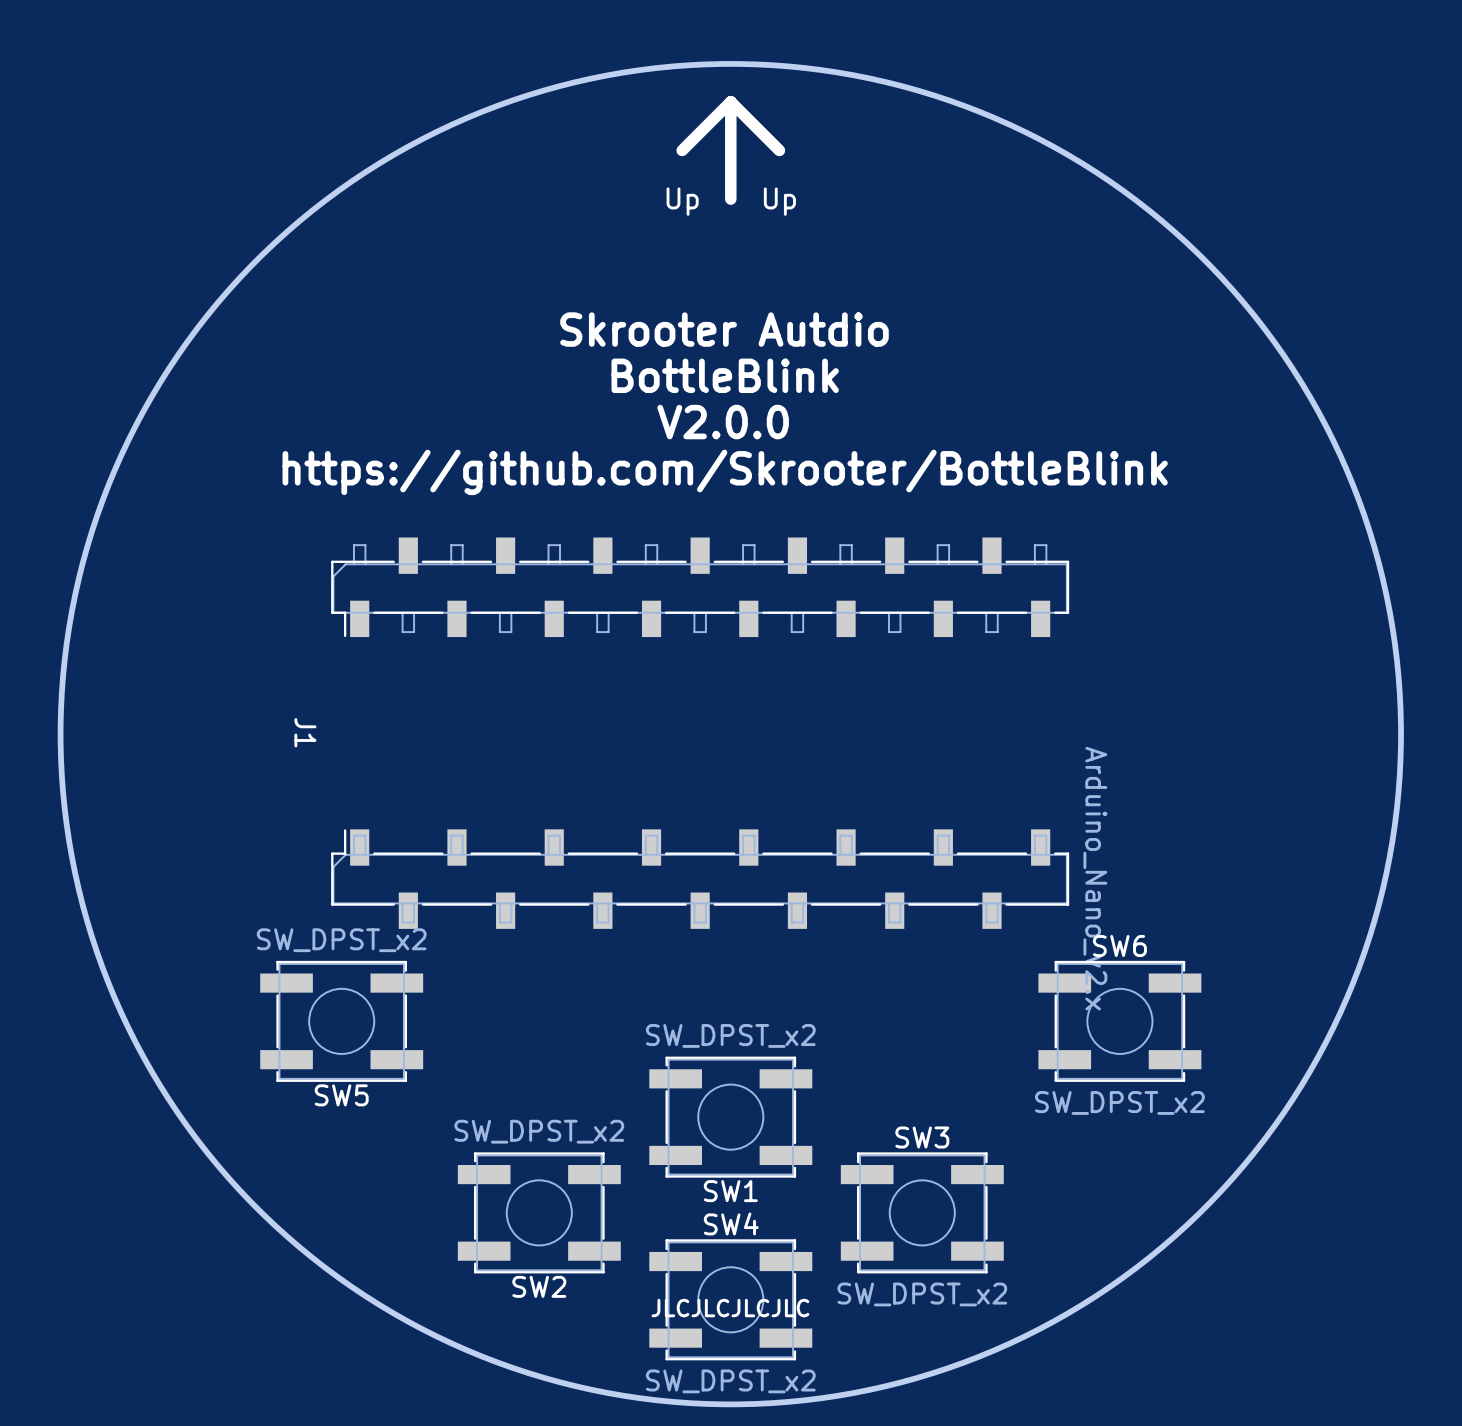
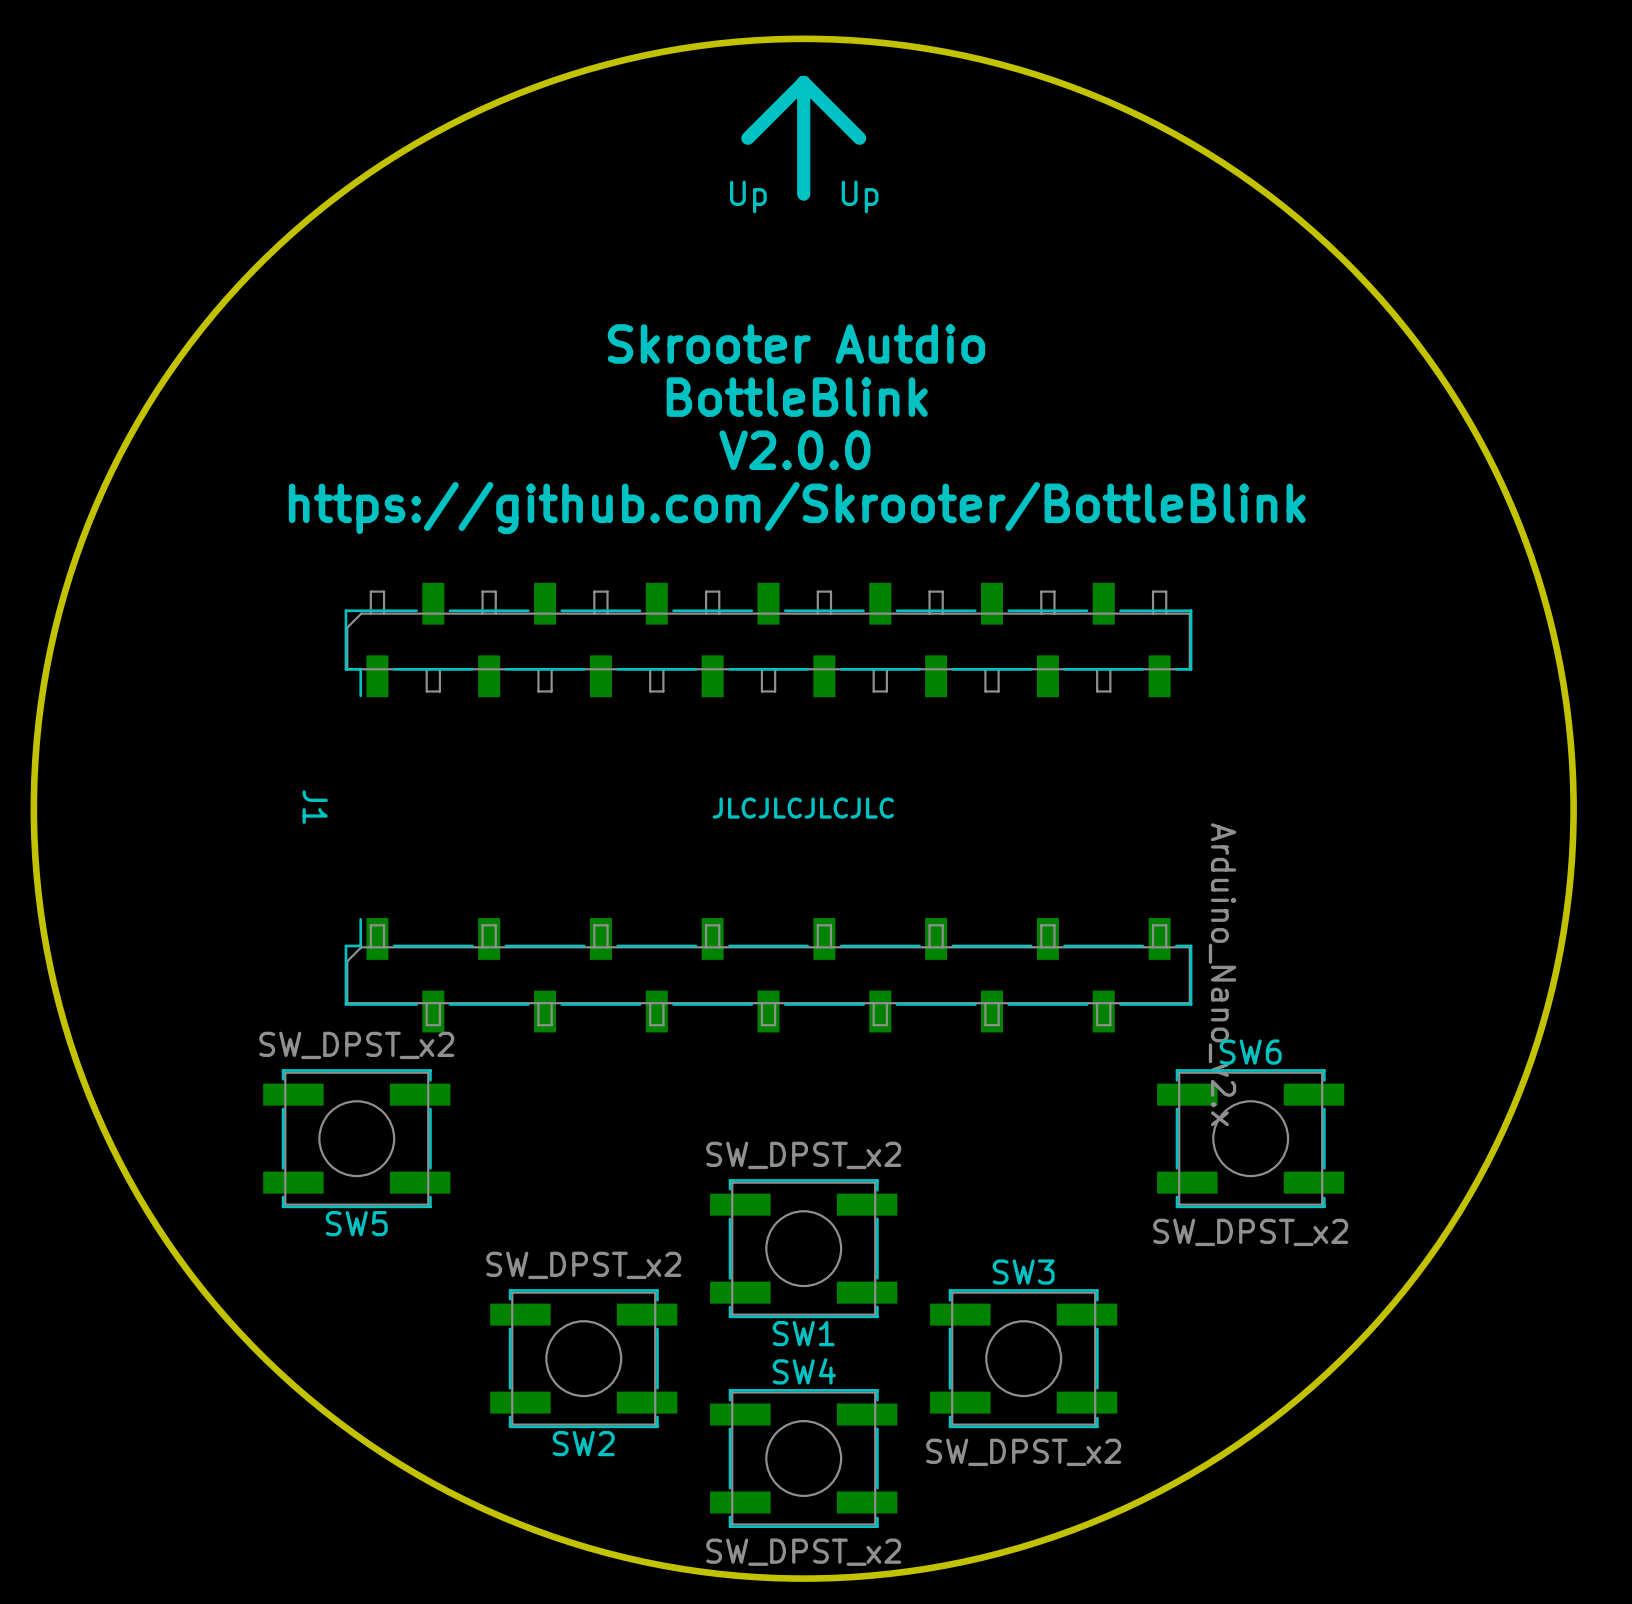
text: none -> JLCJLCJLCJLC (803, 808)
text: JLCJLCJLCJLC (730, 1308) -> none

